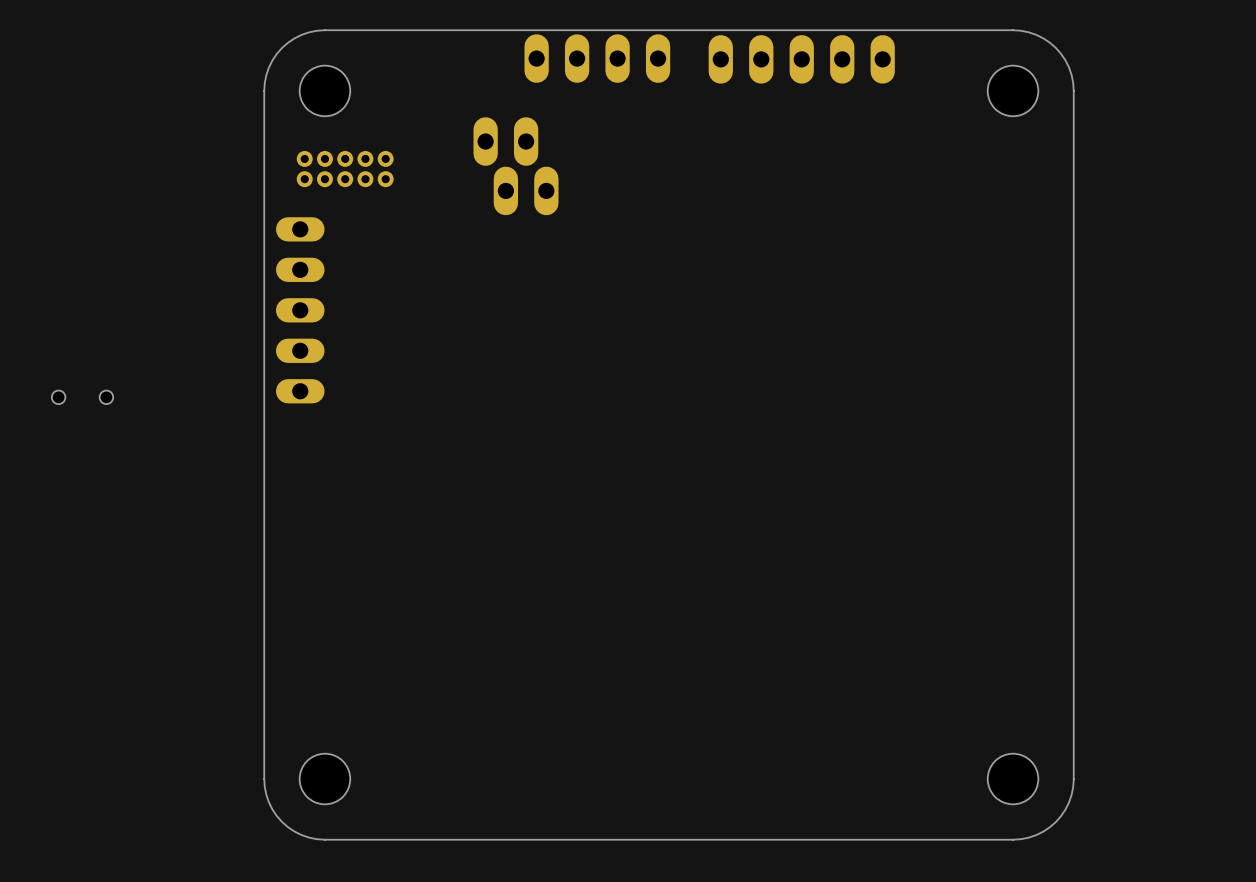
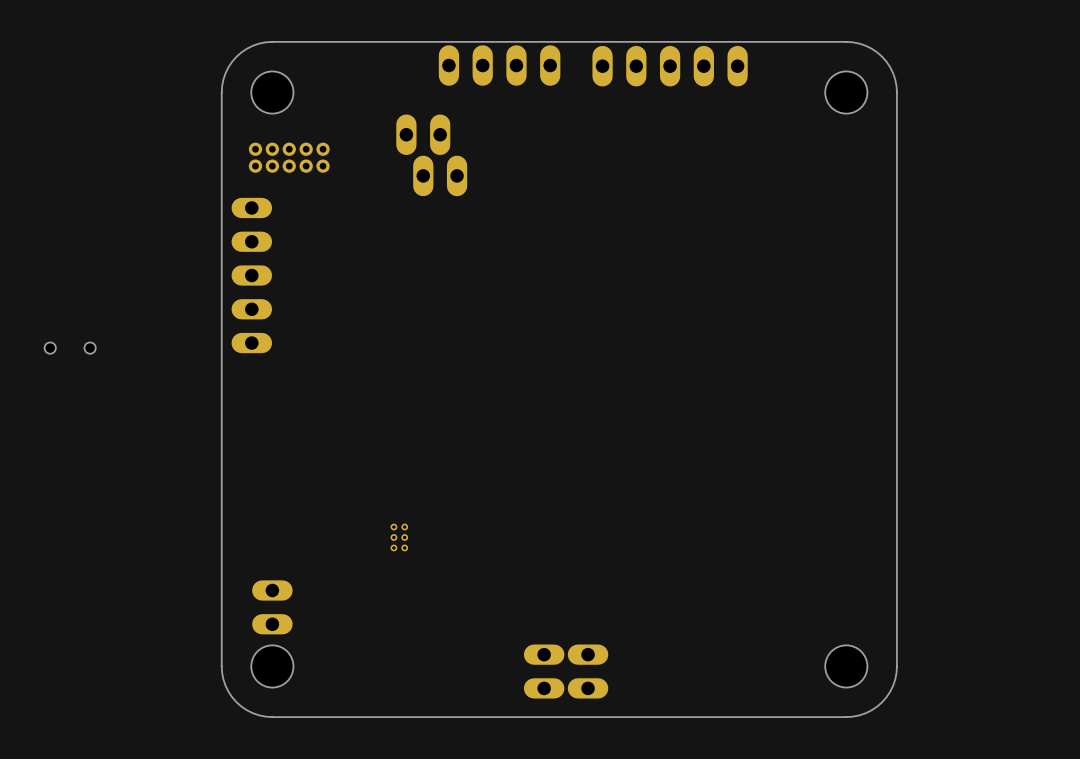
part: none -> (399, 537)
part: none -> (272, 607)
part: none -> (544, 671)
part: none -> (588, 671)

